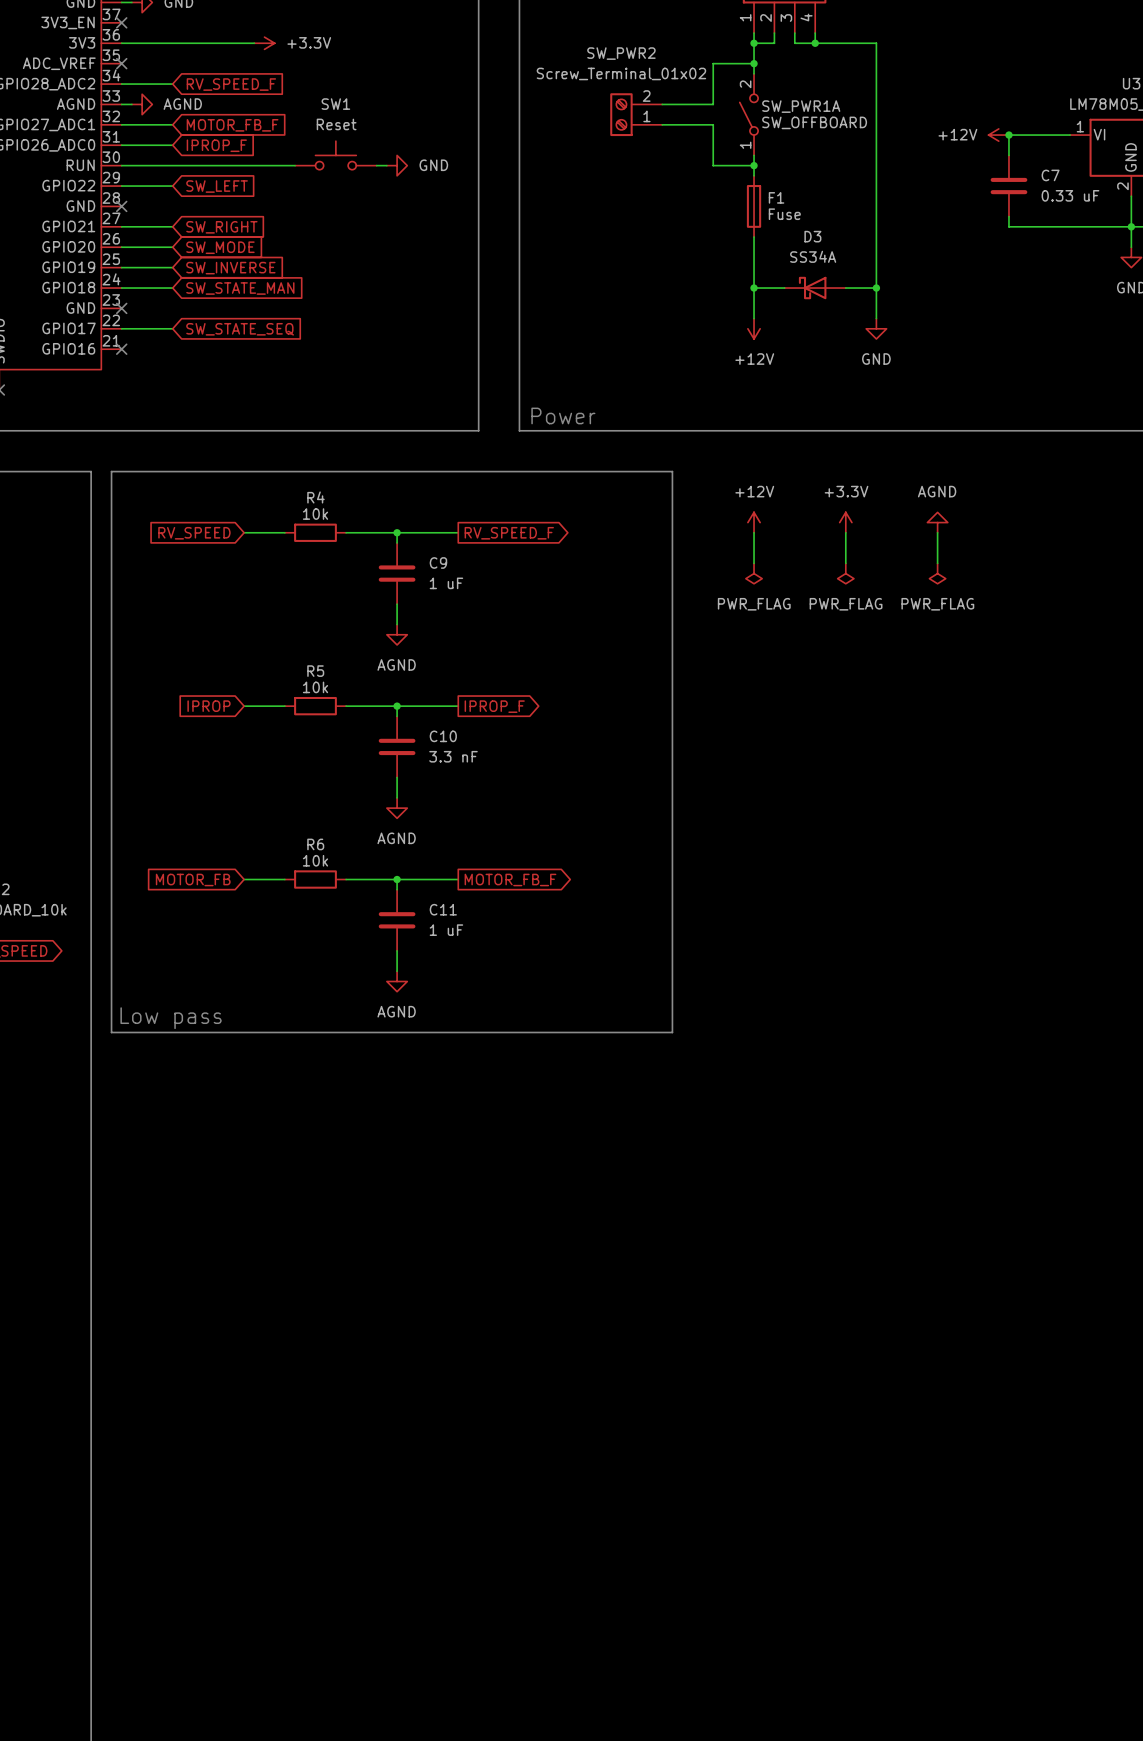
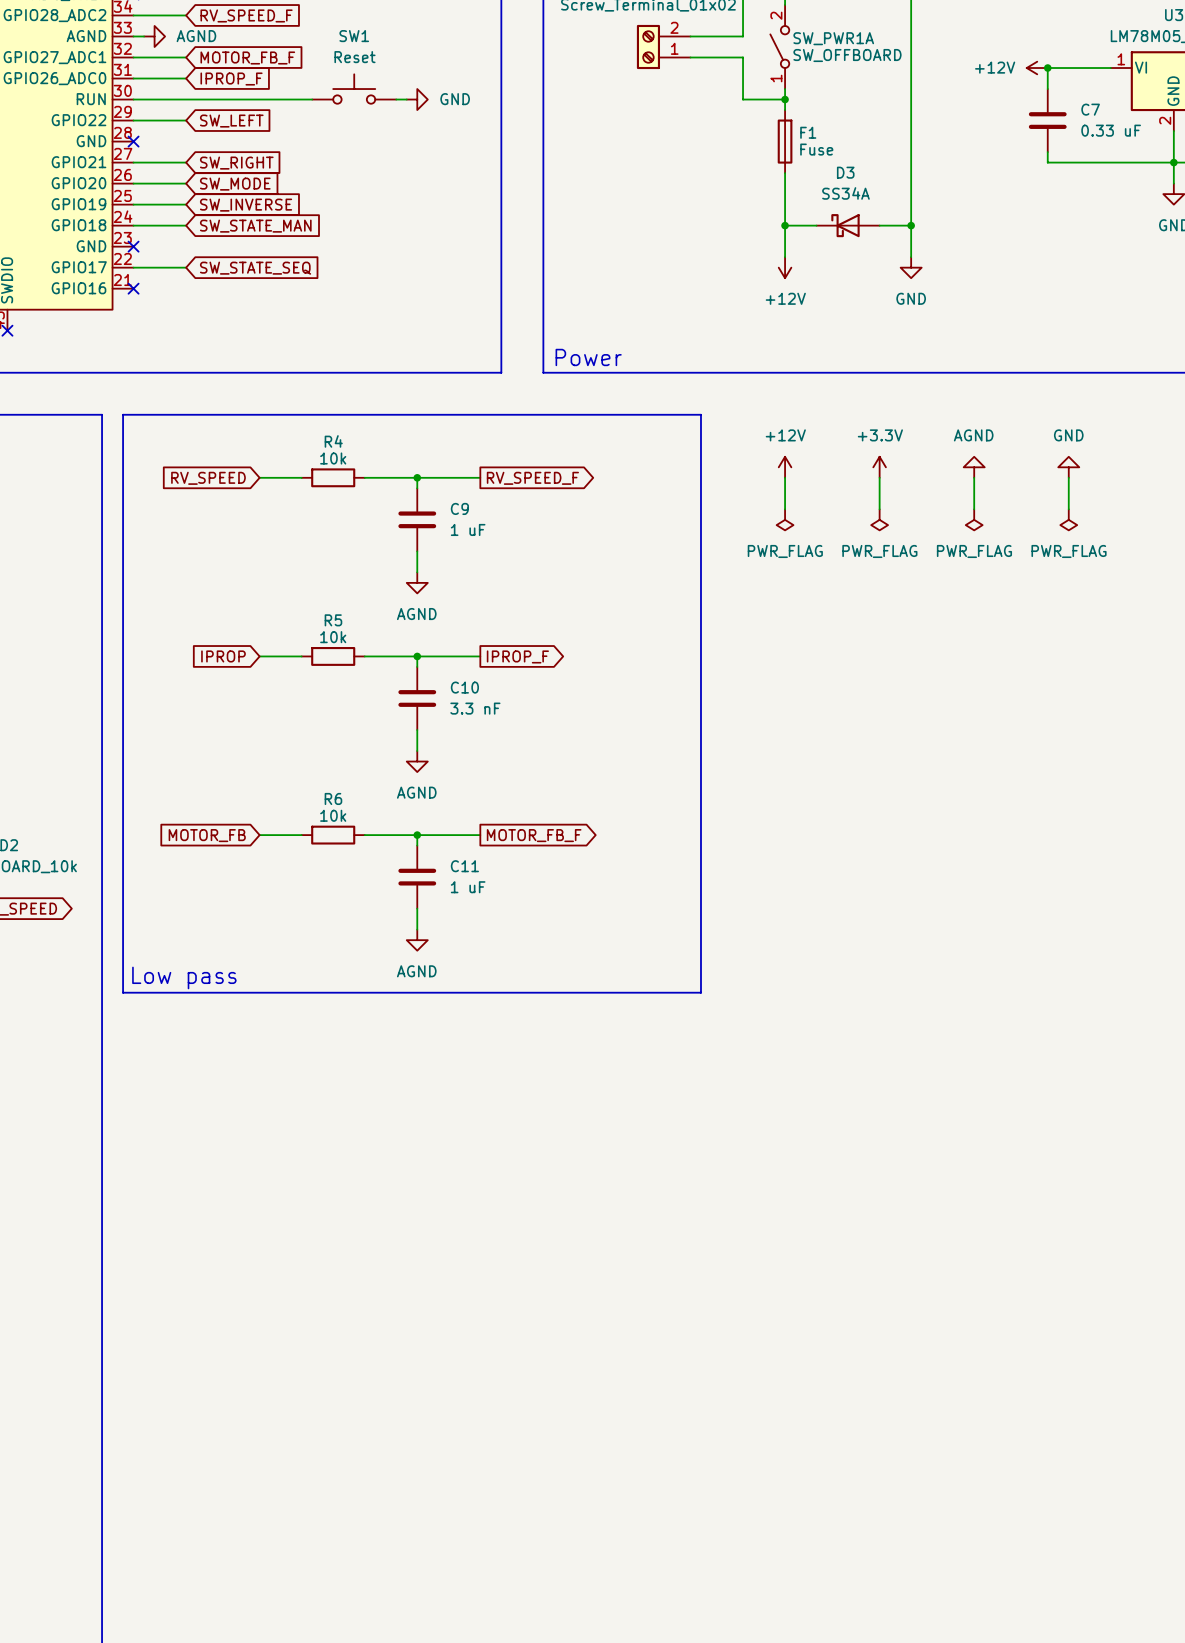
power symbol: none -> GND (1068, 467)
wire: none -> (1068, 477) (1068, 509)
power symbol: none -> PWR_FLAG (1068, 519)

